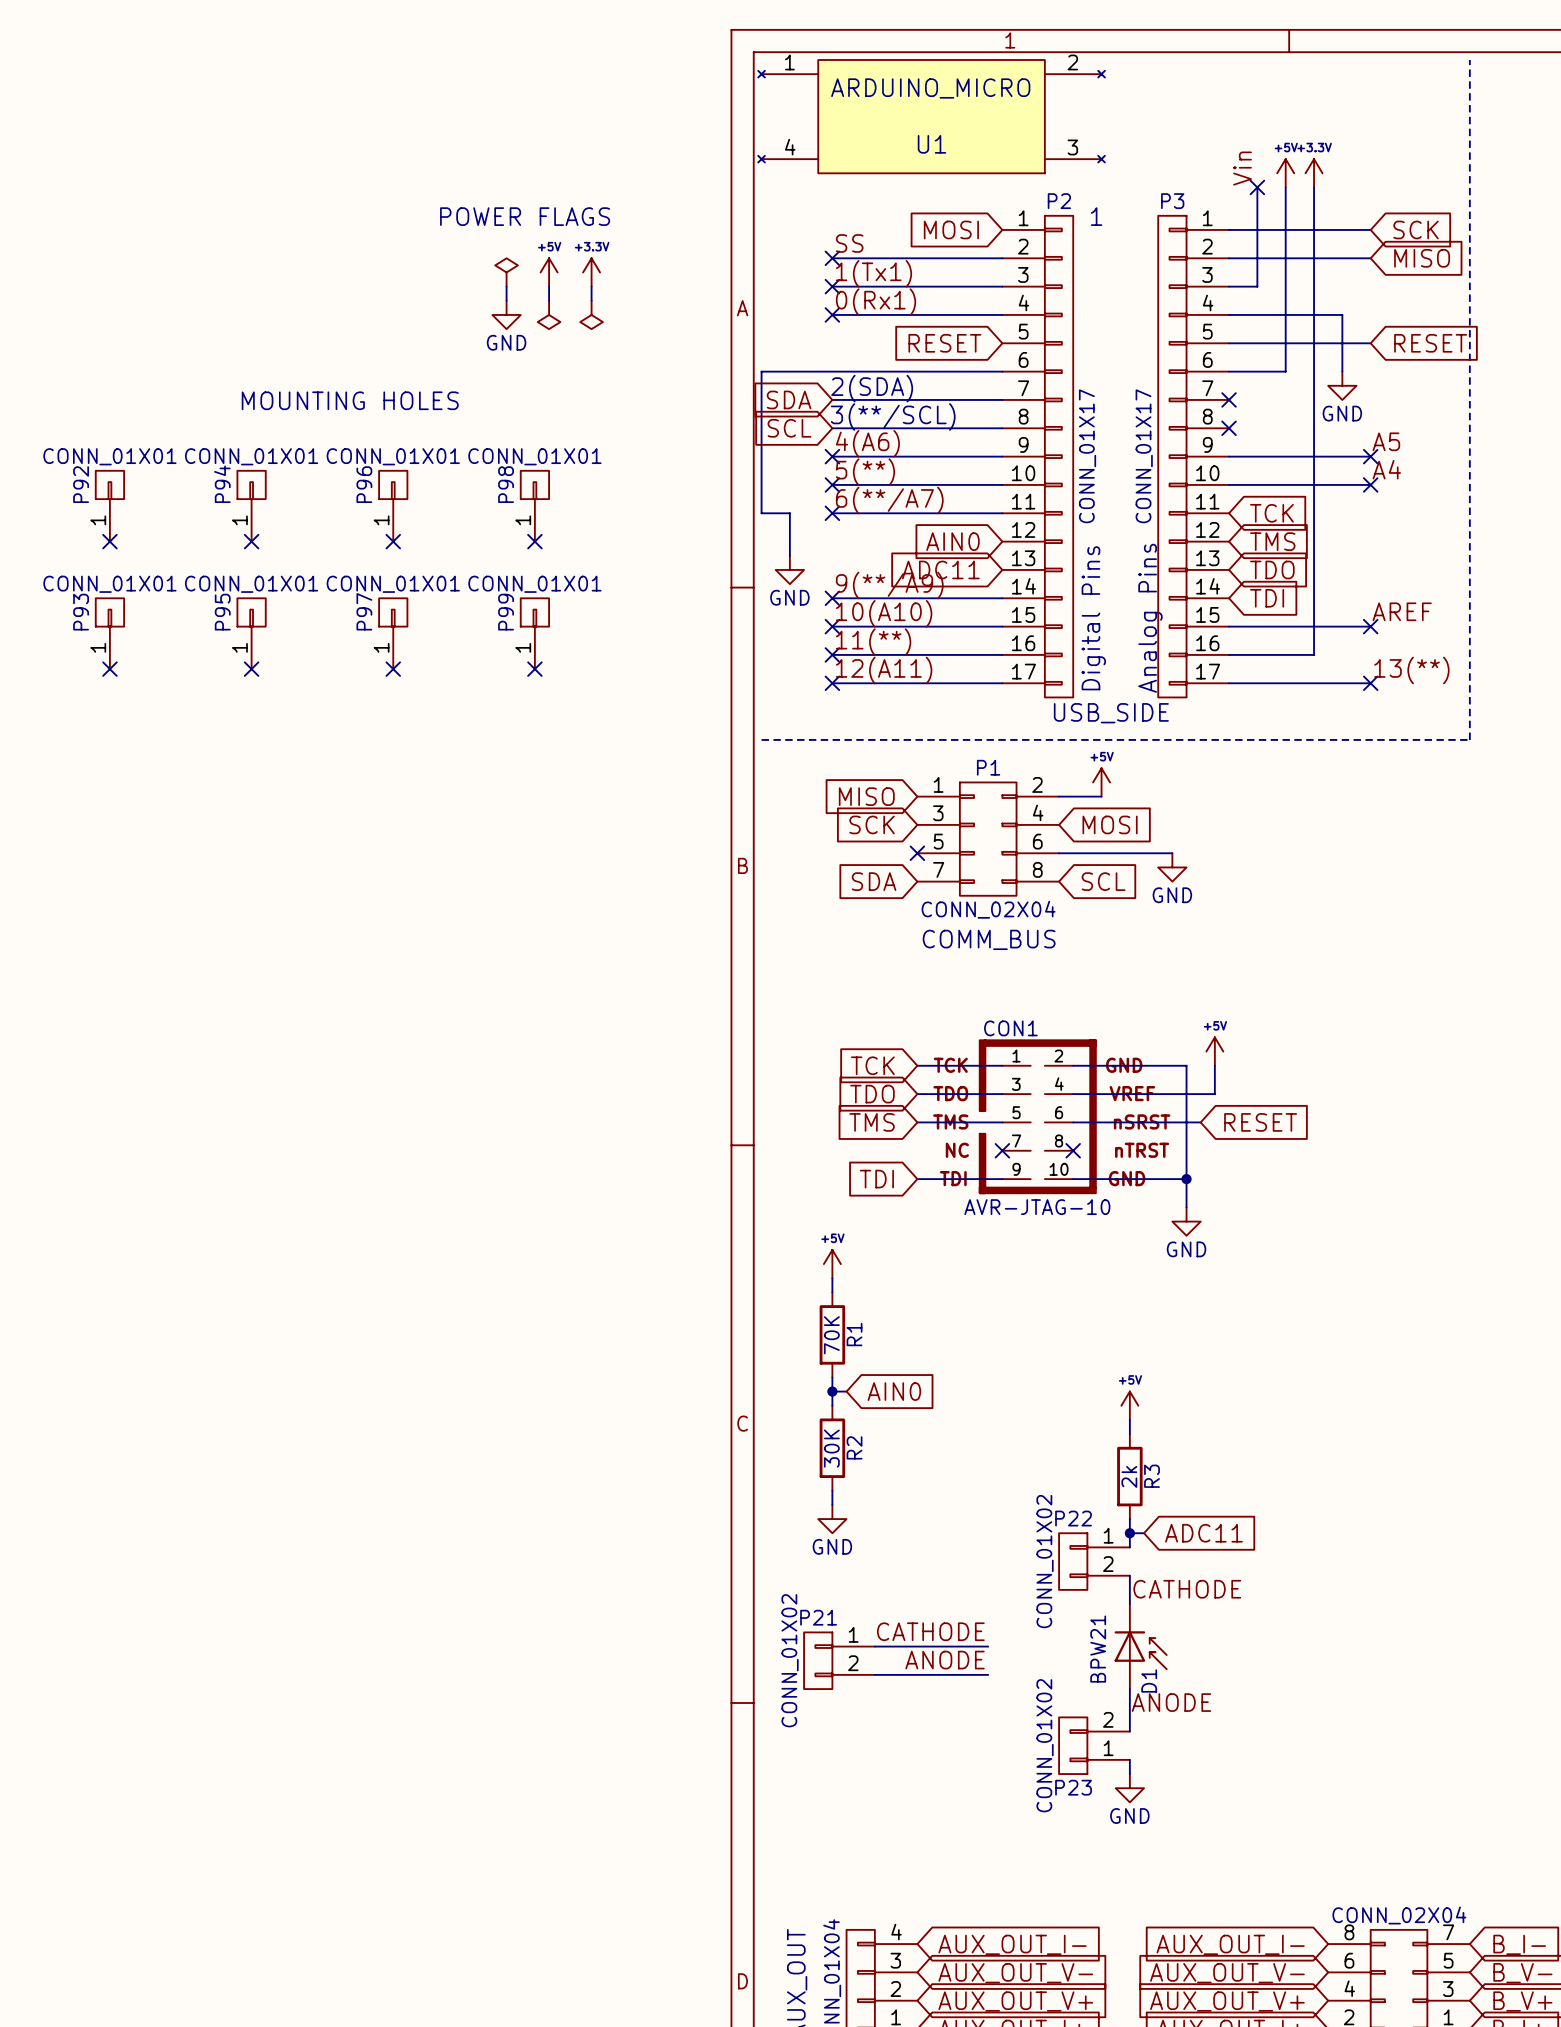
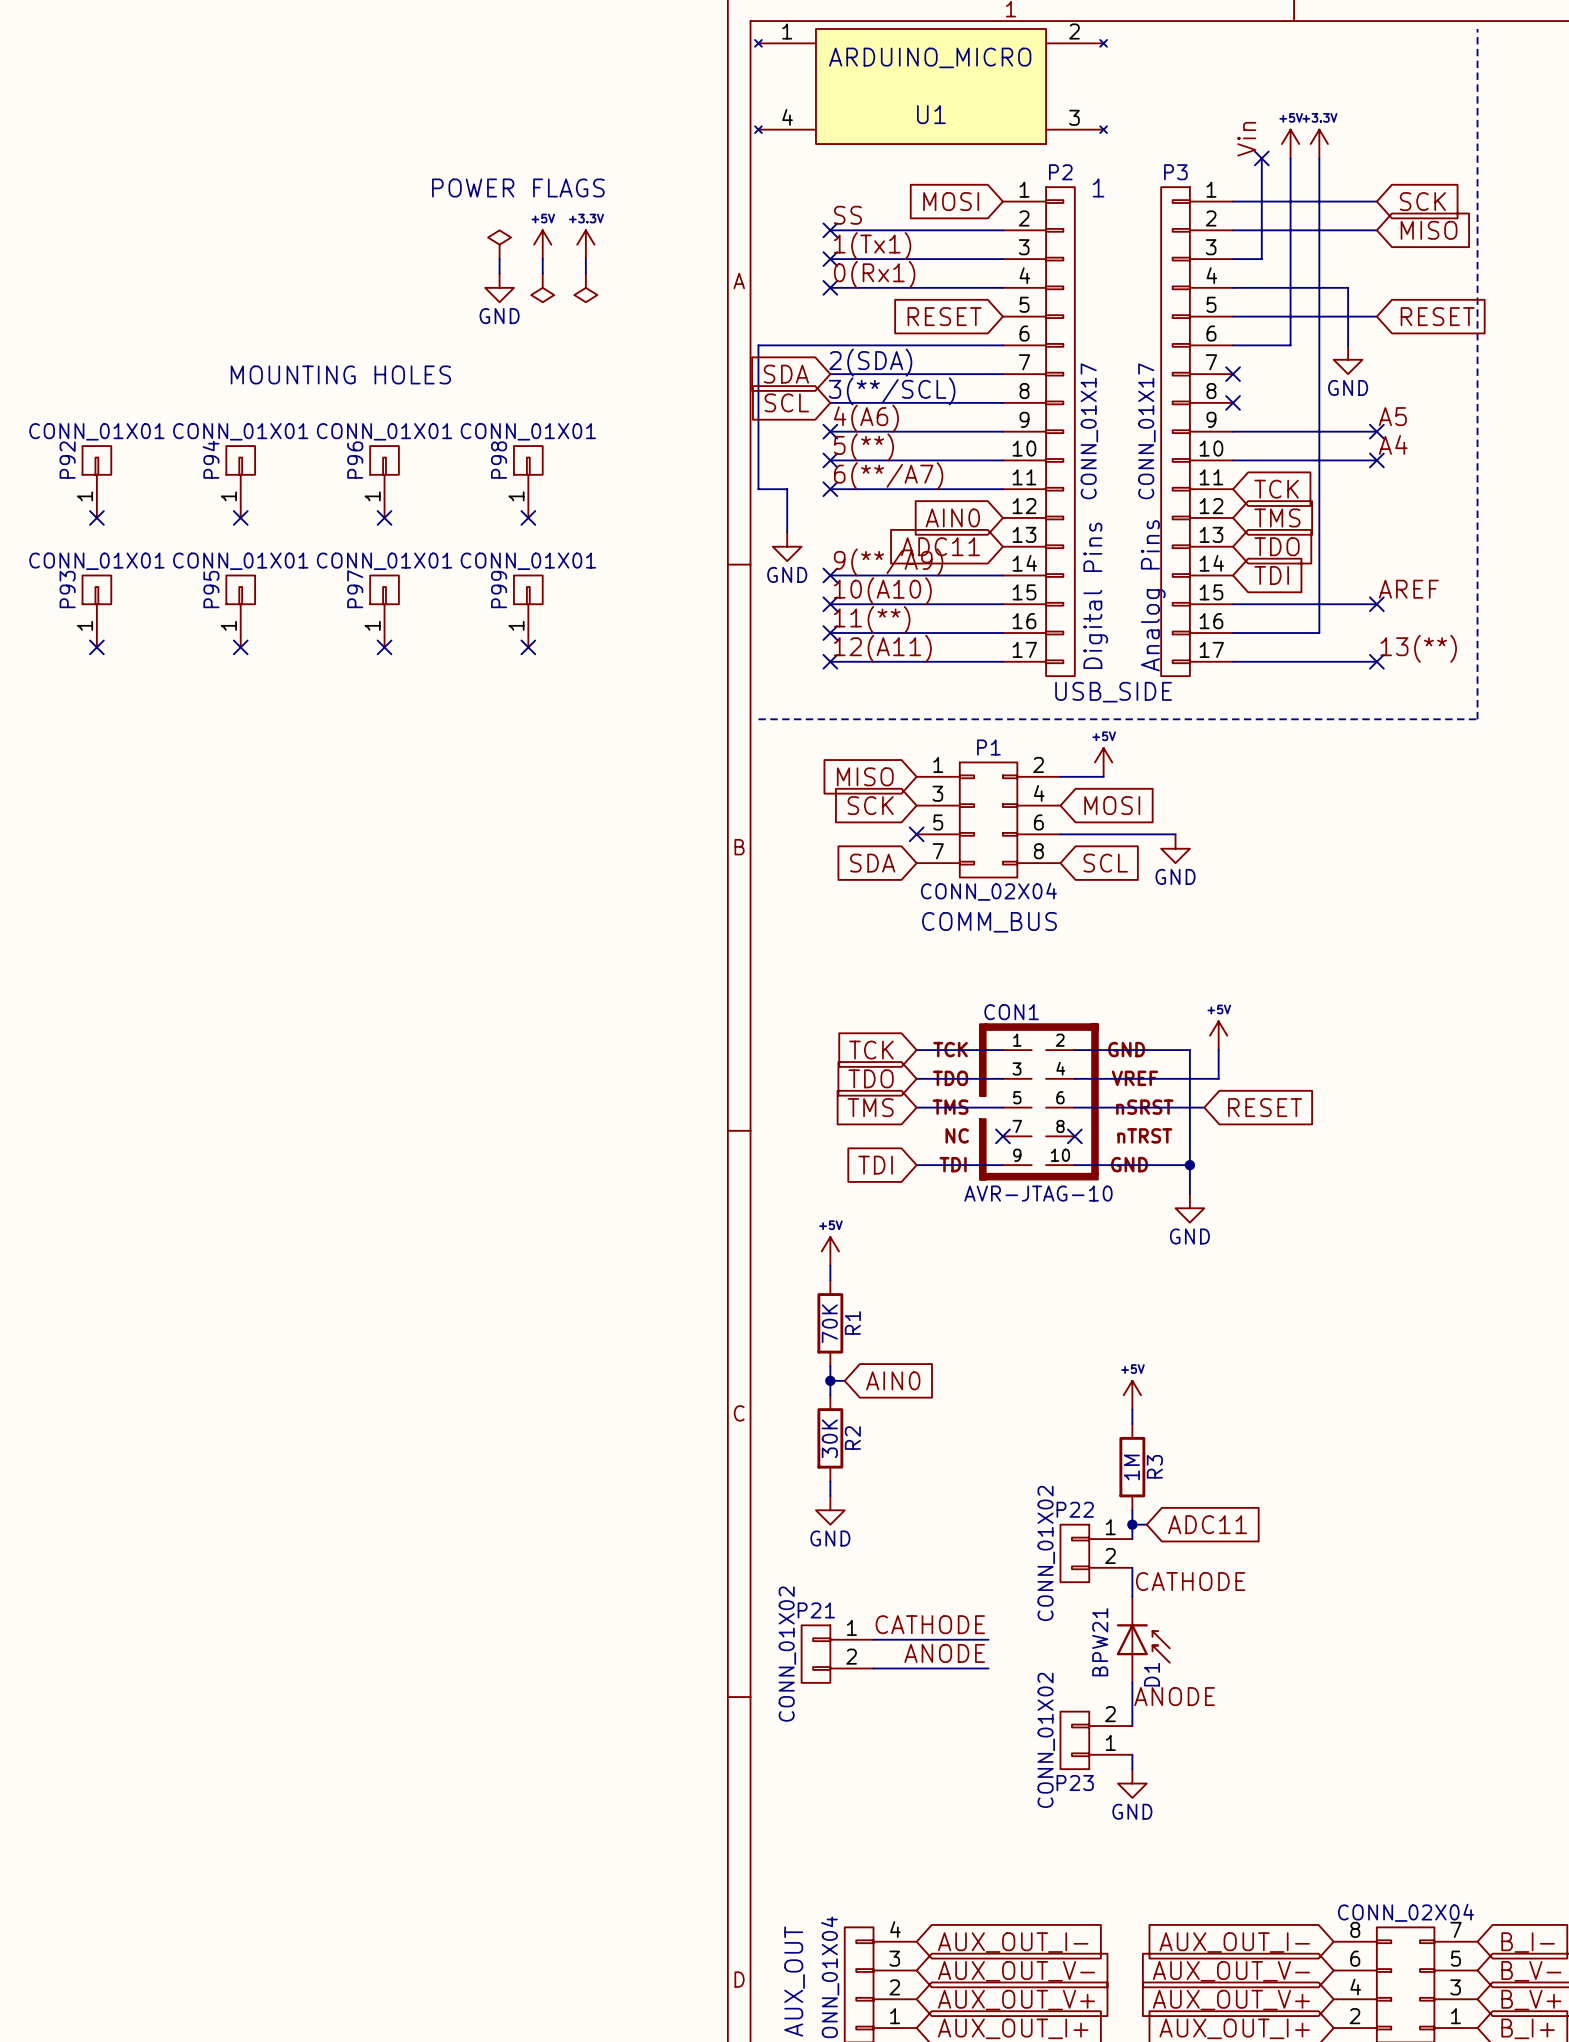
R3 value: 2k (1129, 1476) -> 1M (1131, 1467)

